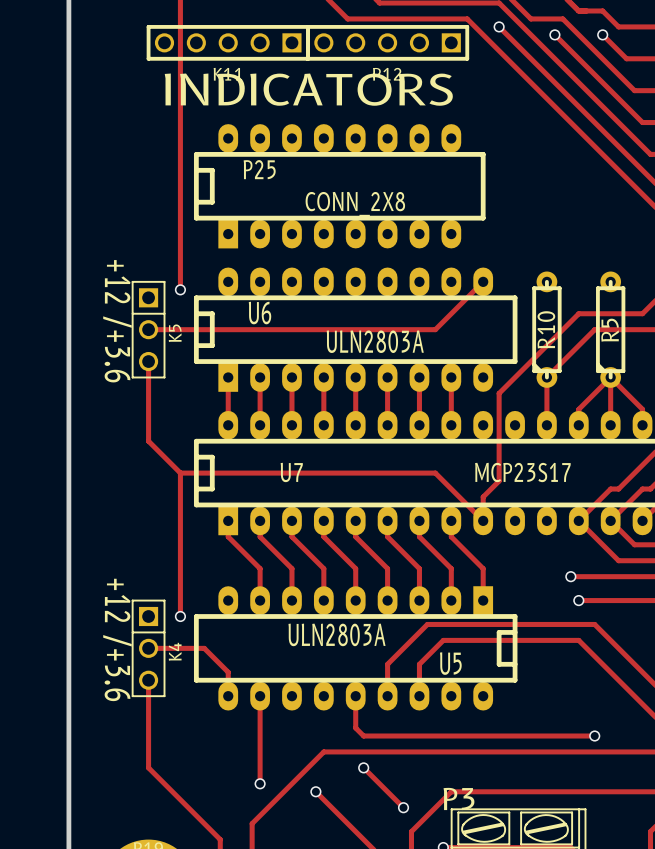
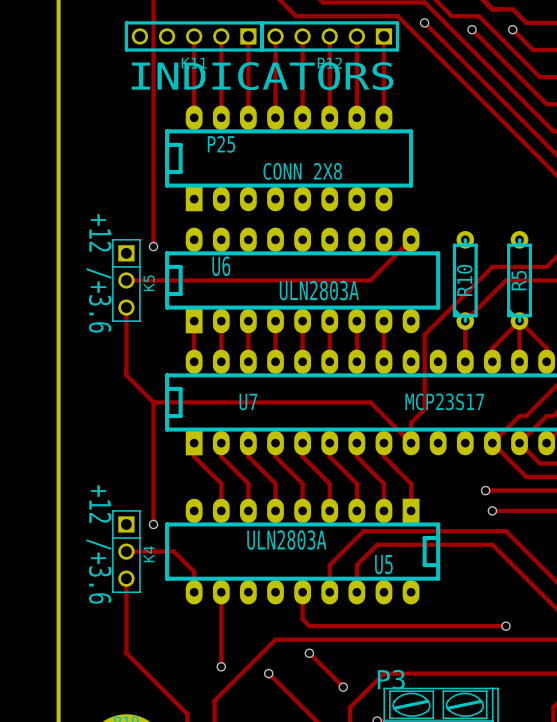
track: none -> (194, 36) (194, 117)
track: none -> (221, 36) (221, 117)
track: none -> (248, 36) (248, 117)
track: none -> (275, 36) (275, 117)
track: none -> (302, 36) (302, 117)
track: none -> (329, 36) (329, 117)
track: none -> (356, 36) (356, 117)
track: none -> (383, 36) (383, 117)

